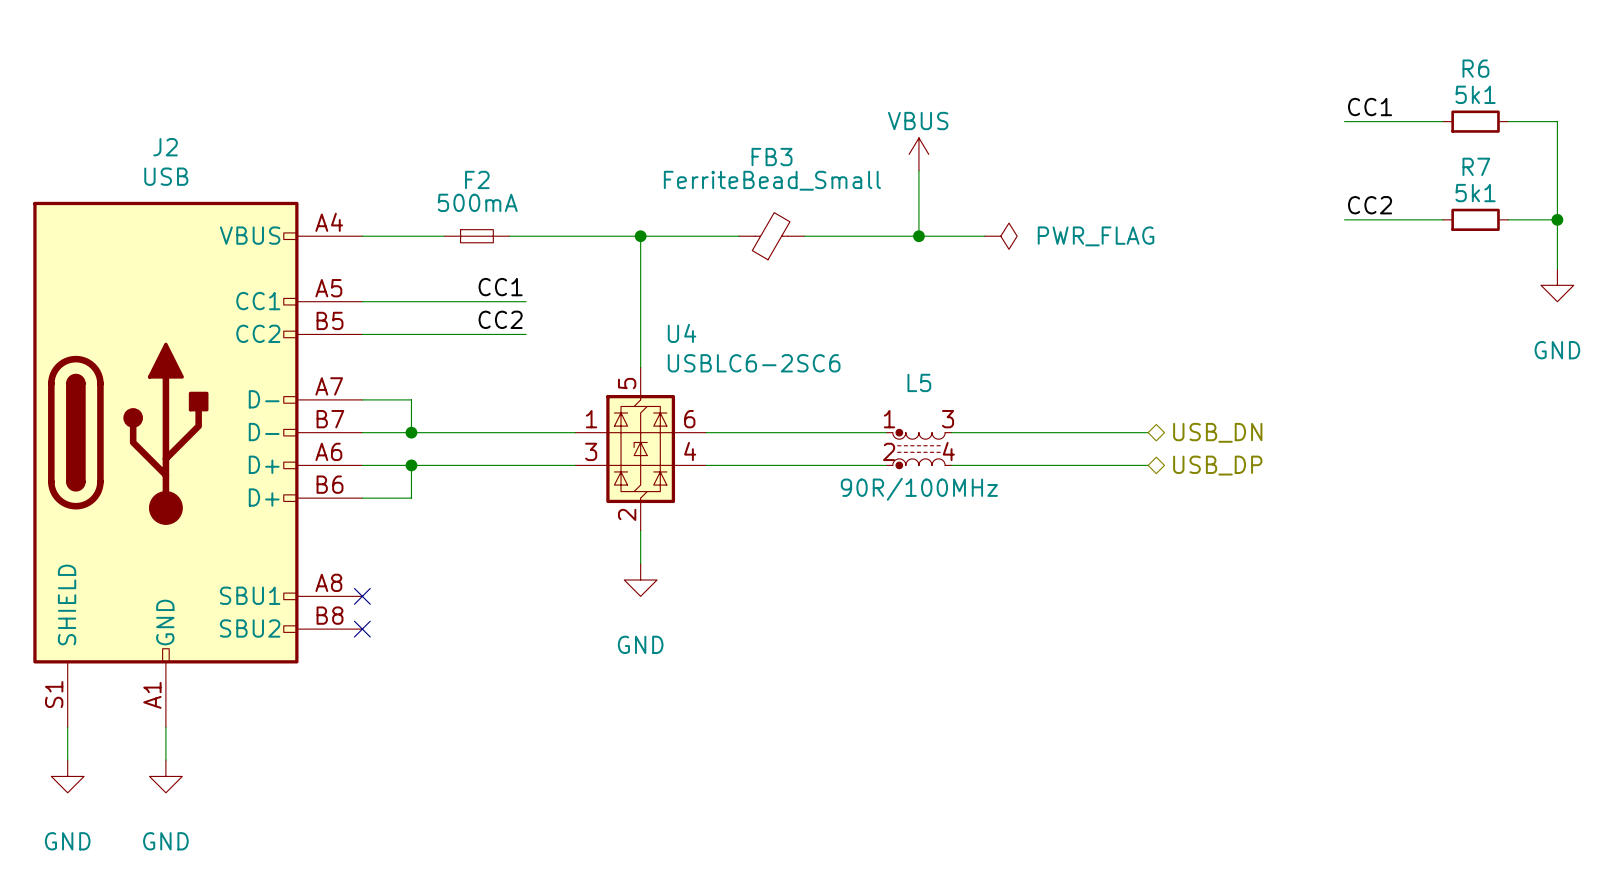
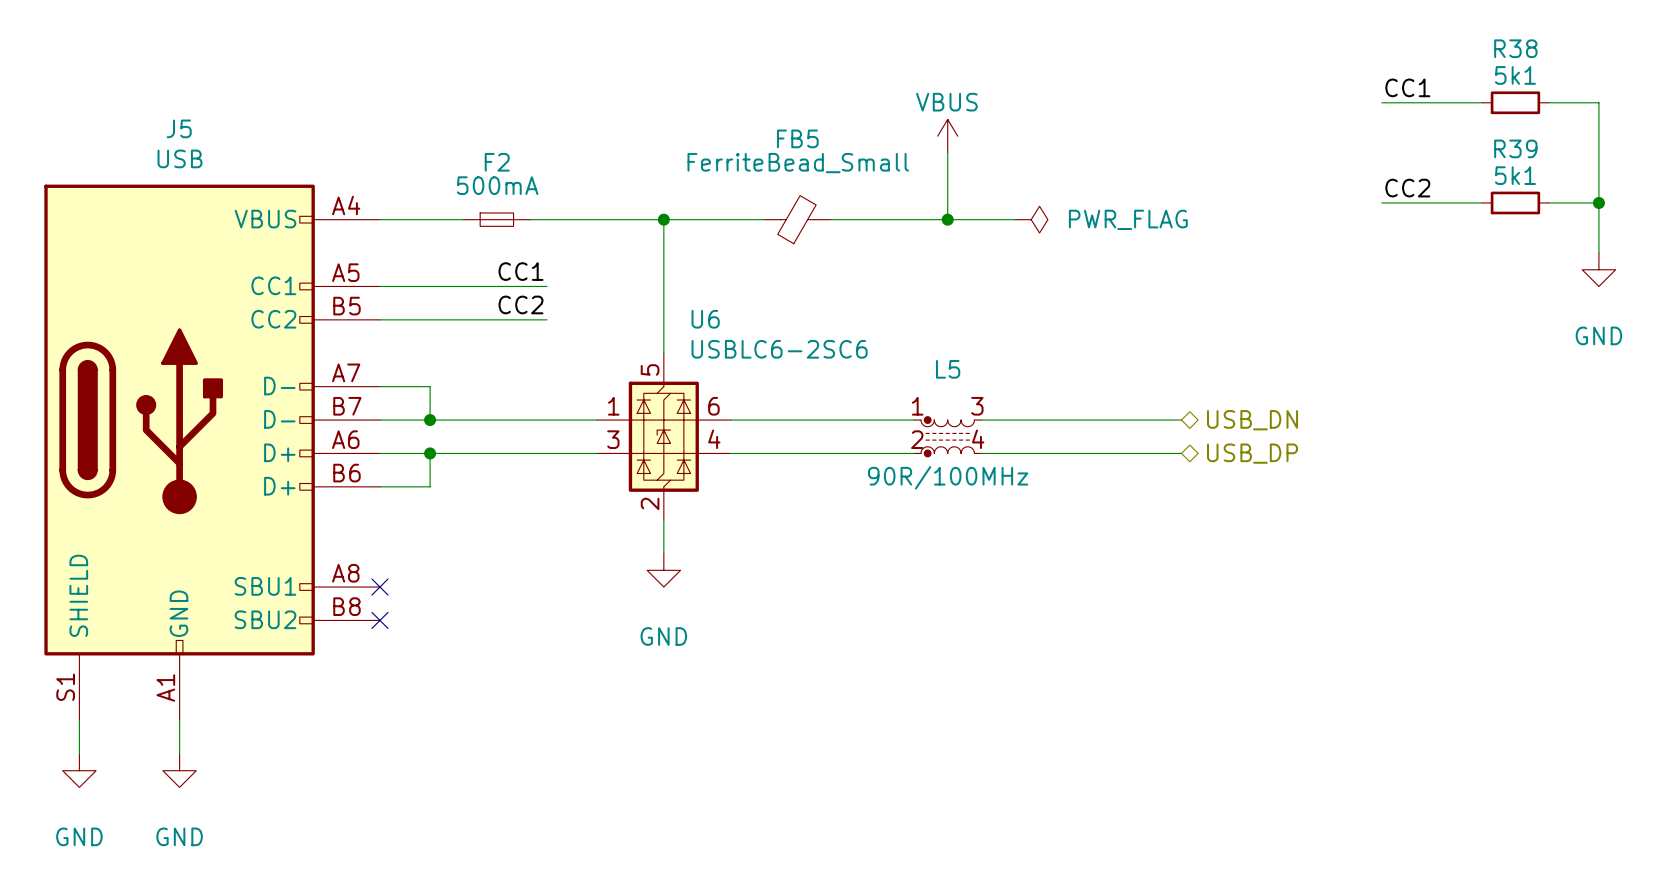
R6 name: R6 (1475, 68) -> R38 (1515, 48)
J2 name: J2 (165, 147) -> J5 (179, 128)
FB3 name: FB3 (772, 157) -> FB5 (797, 138)
R7 name: R7 (1476, 166) -> R39 (1515, 148)
U4 name: U4 (682, 333) -> U6 (705, 319)

